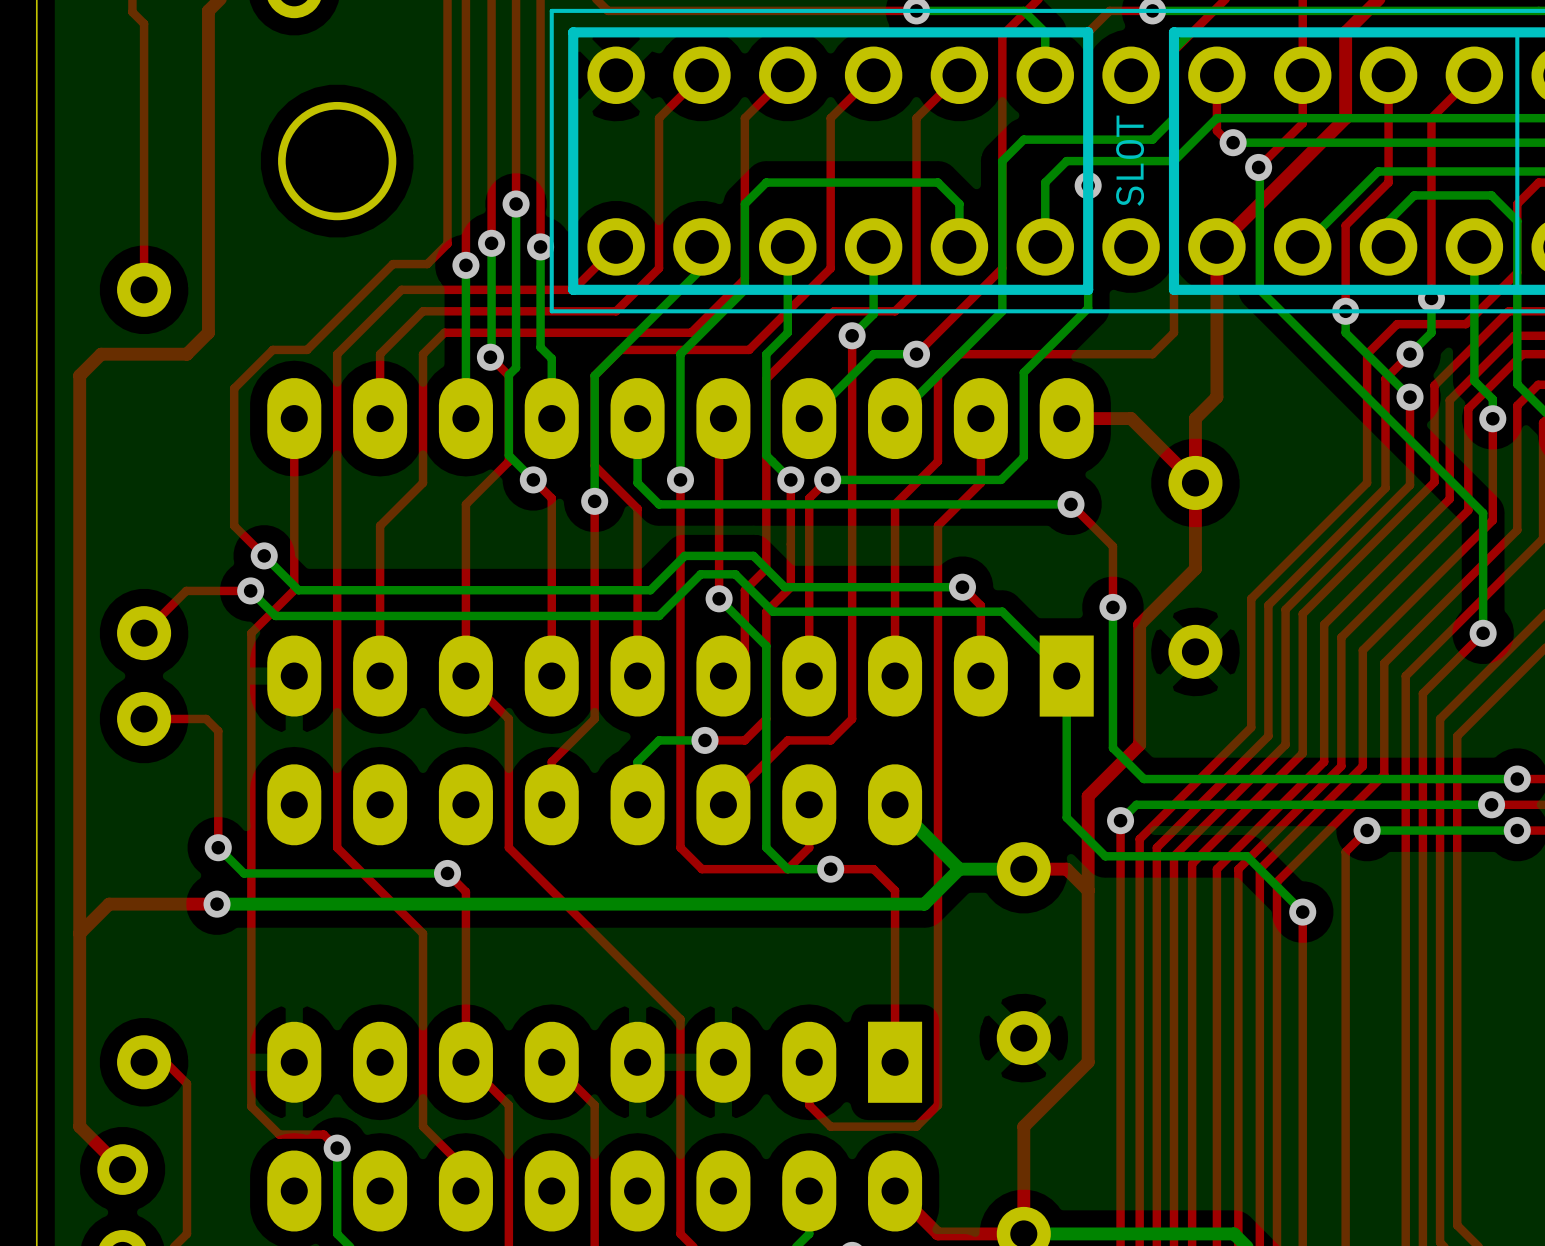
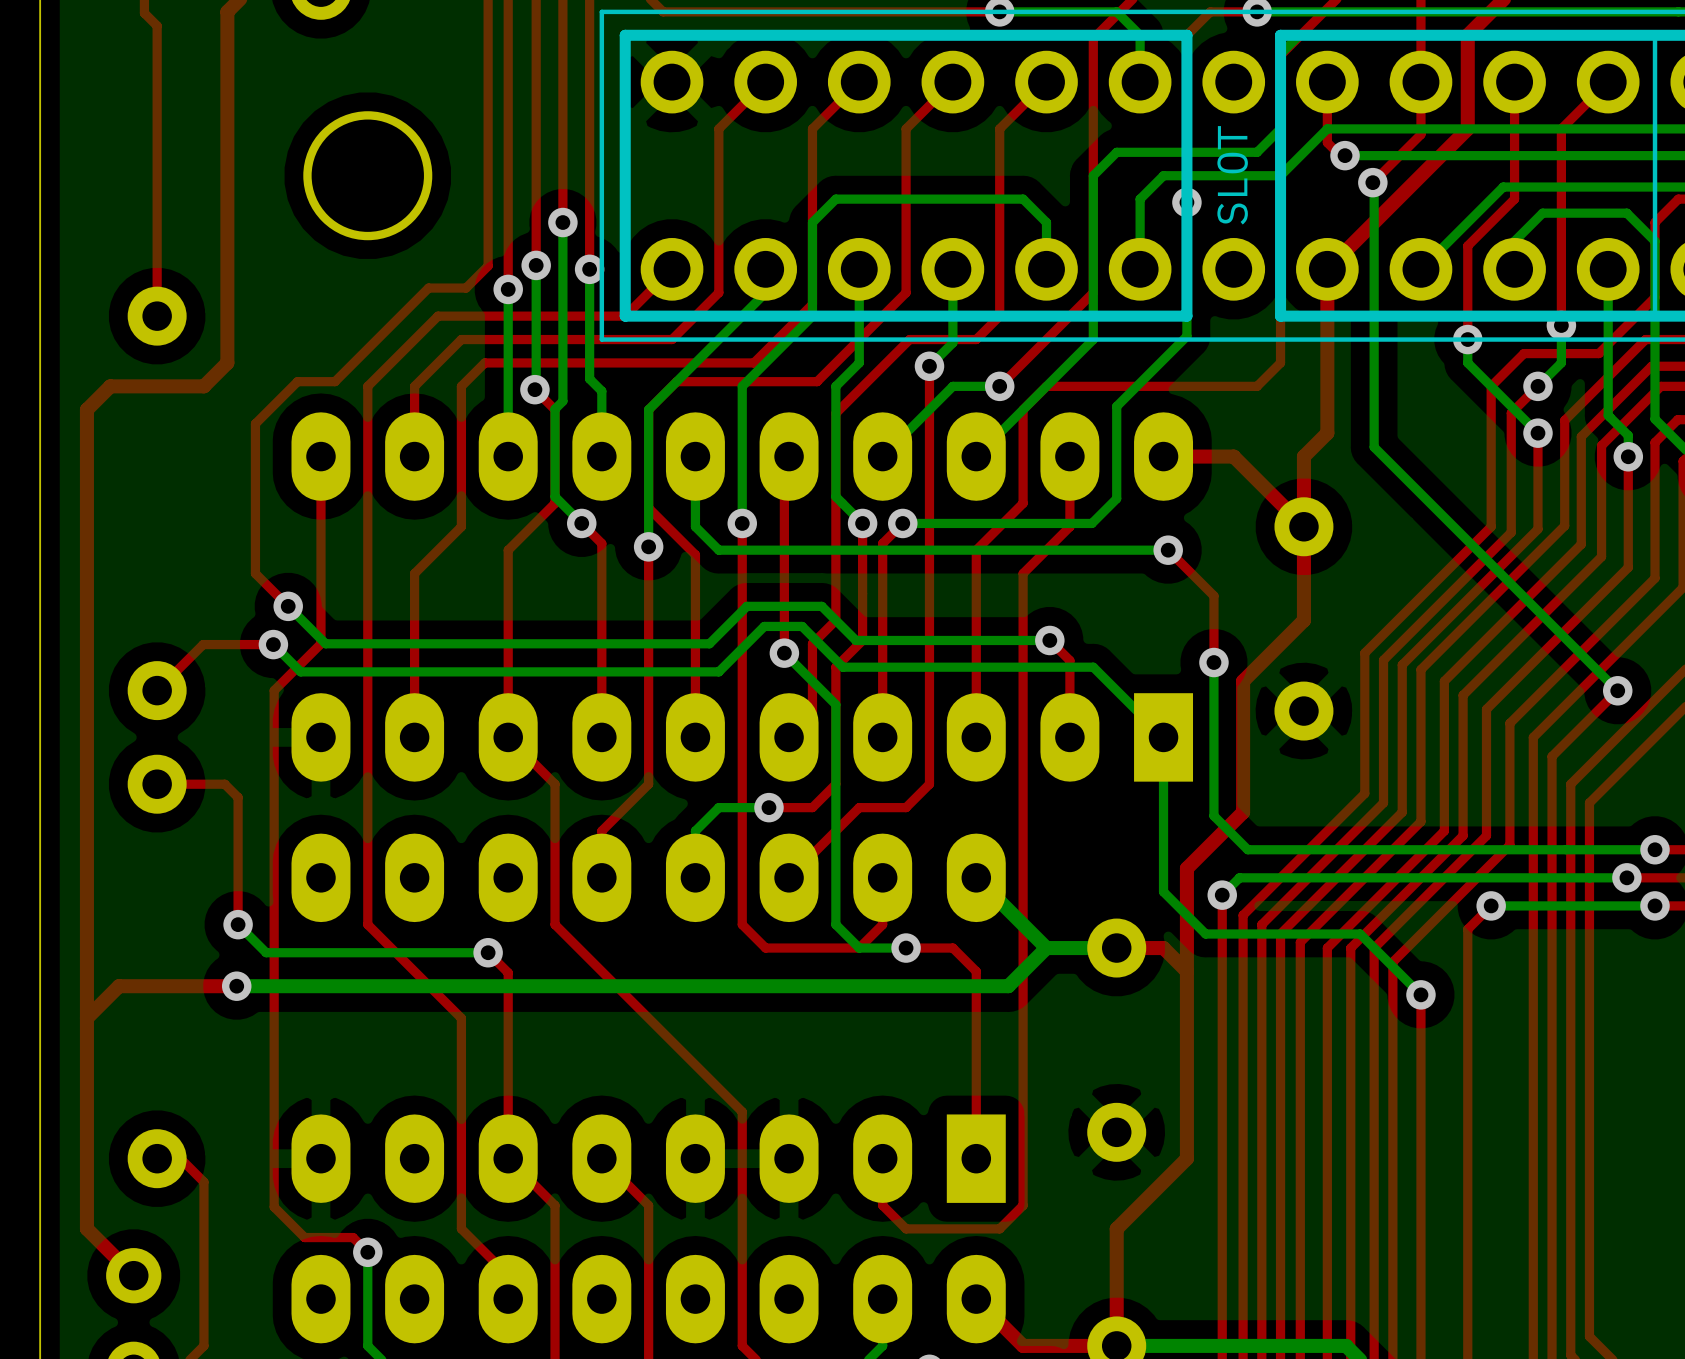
bottom track: (1259, 289) (1483, 513) (1483, 633) -> (1374, 316) (1374, 447) (1617, 690)

